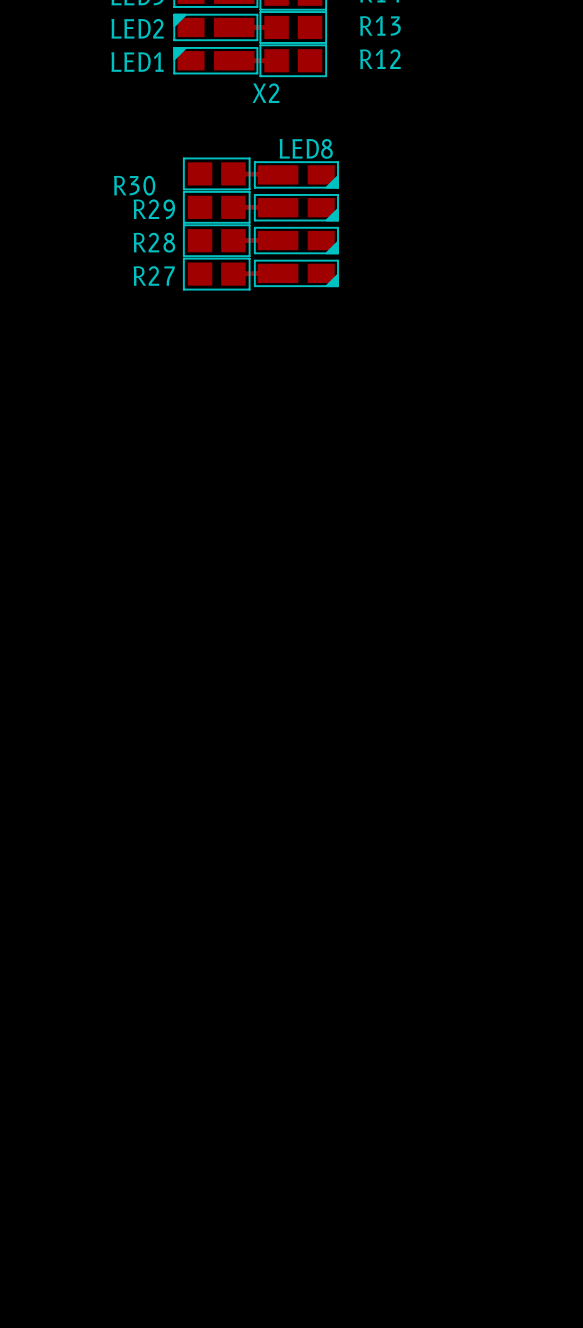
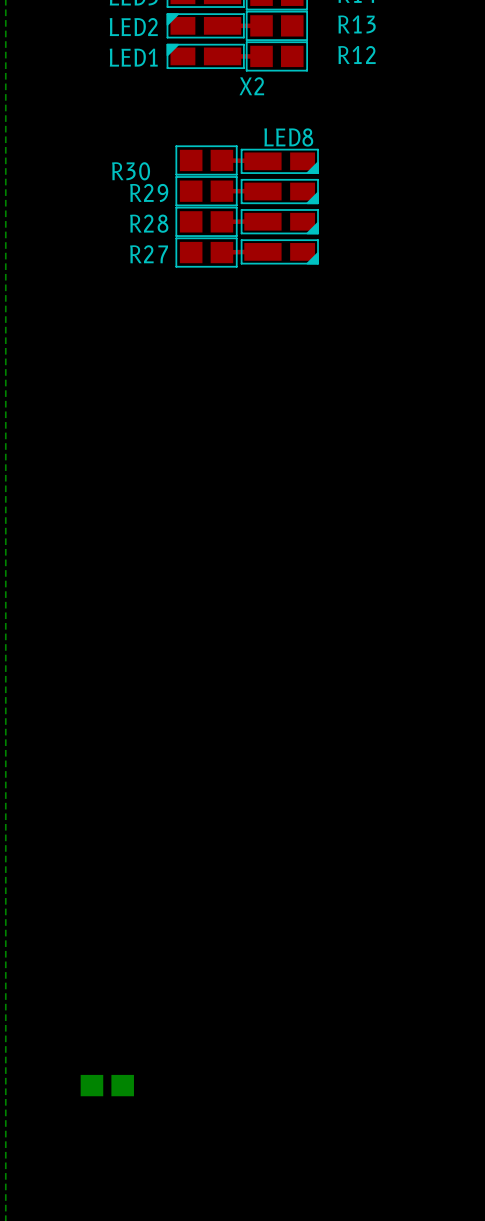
part: none -> (107, 1085)

